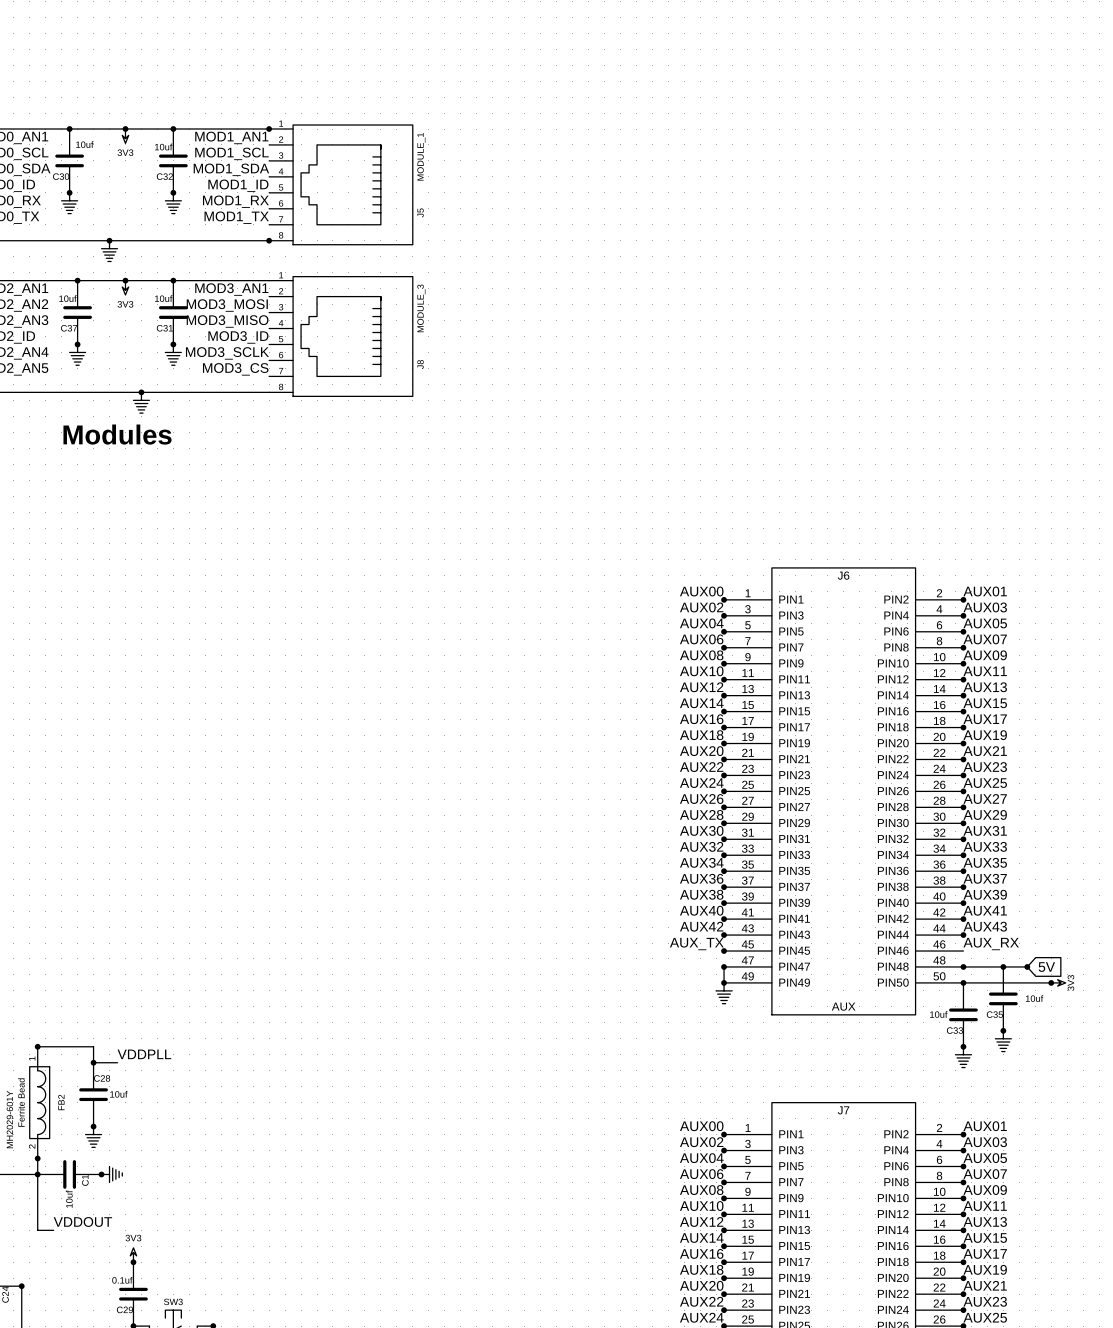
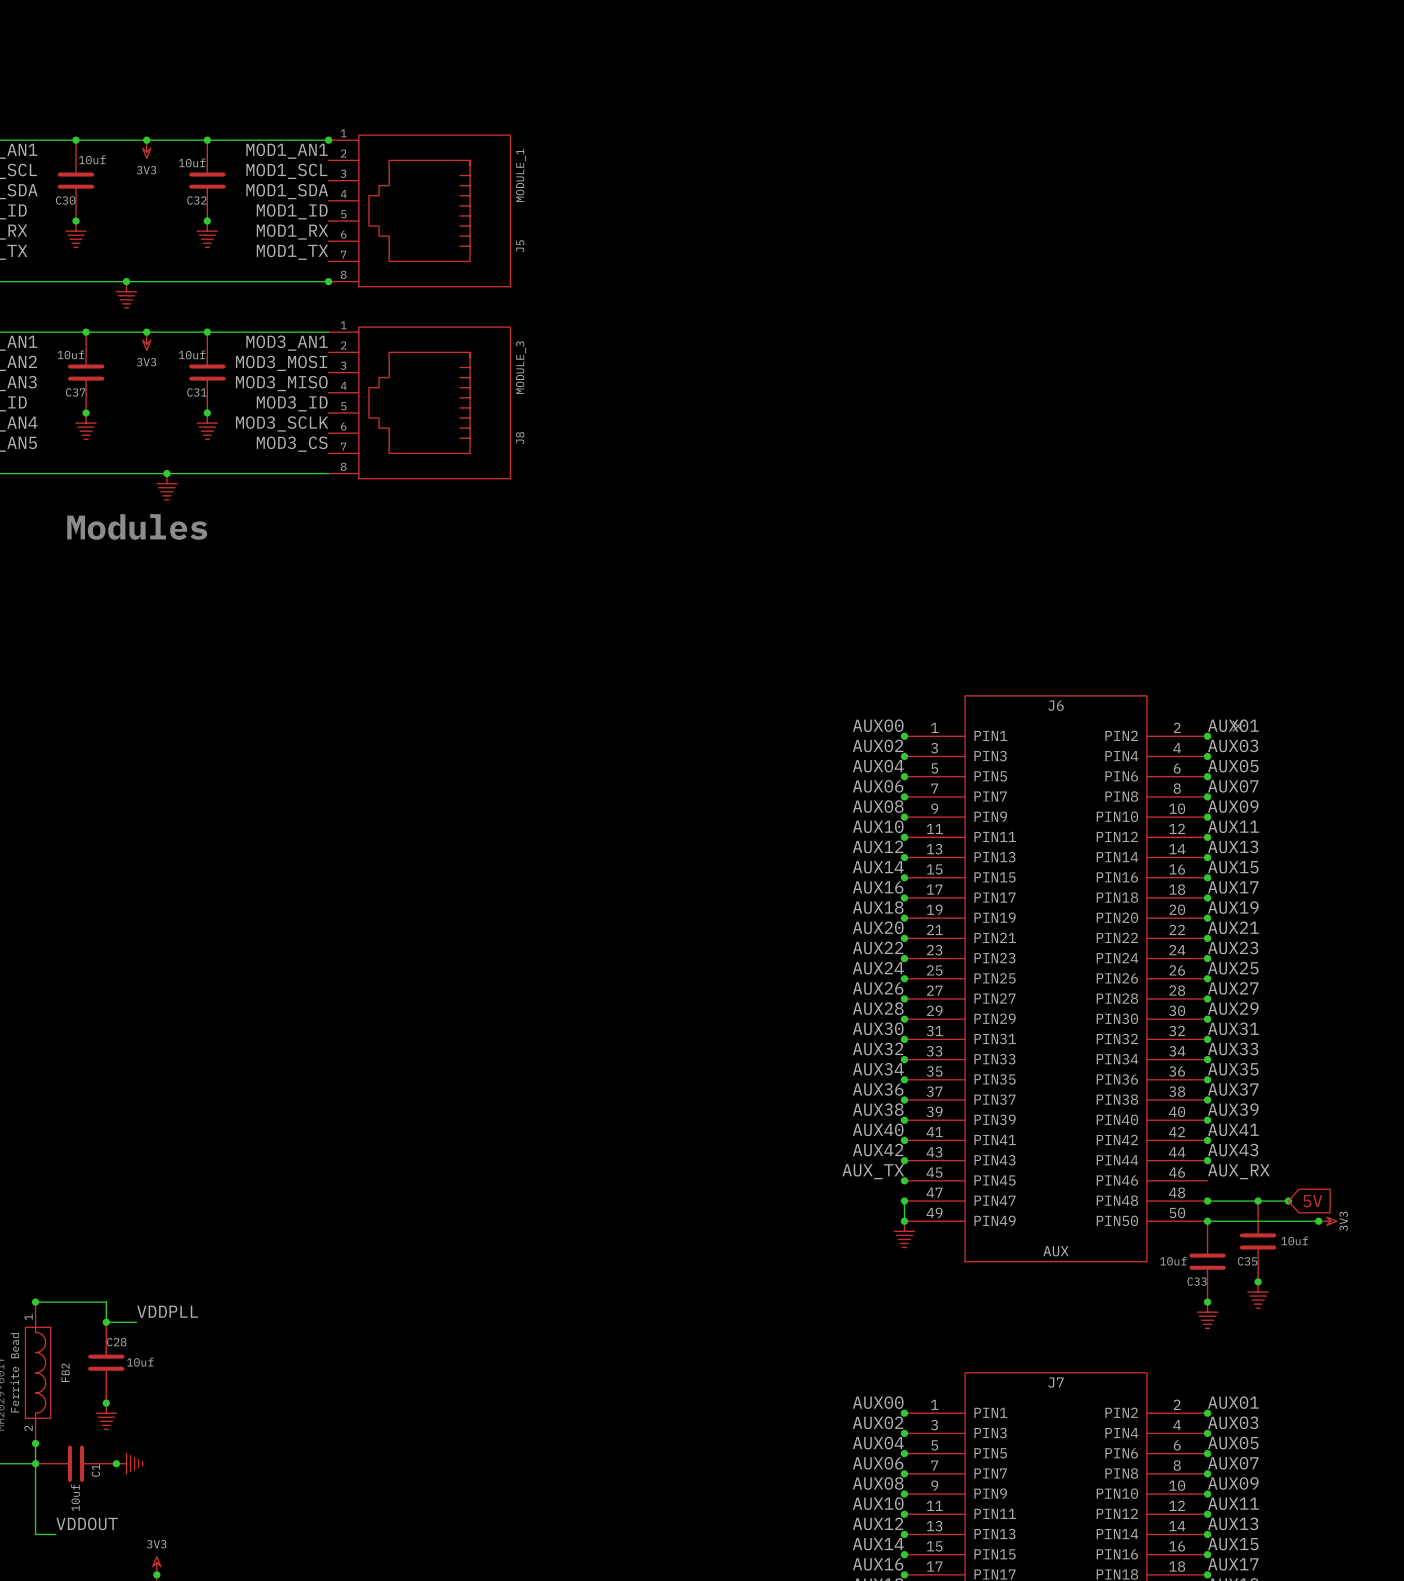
no-connect mark: none -> (1237, 726)

